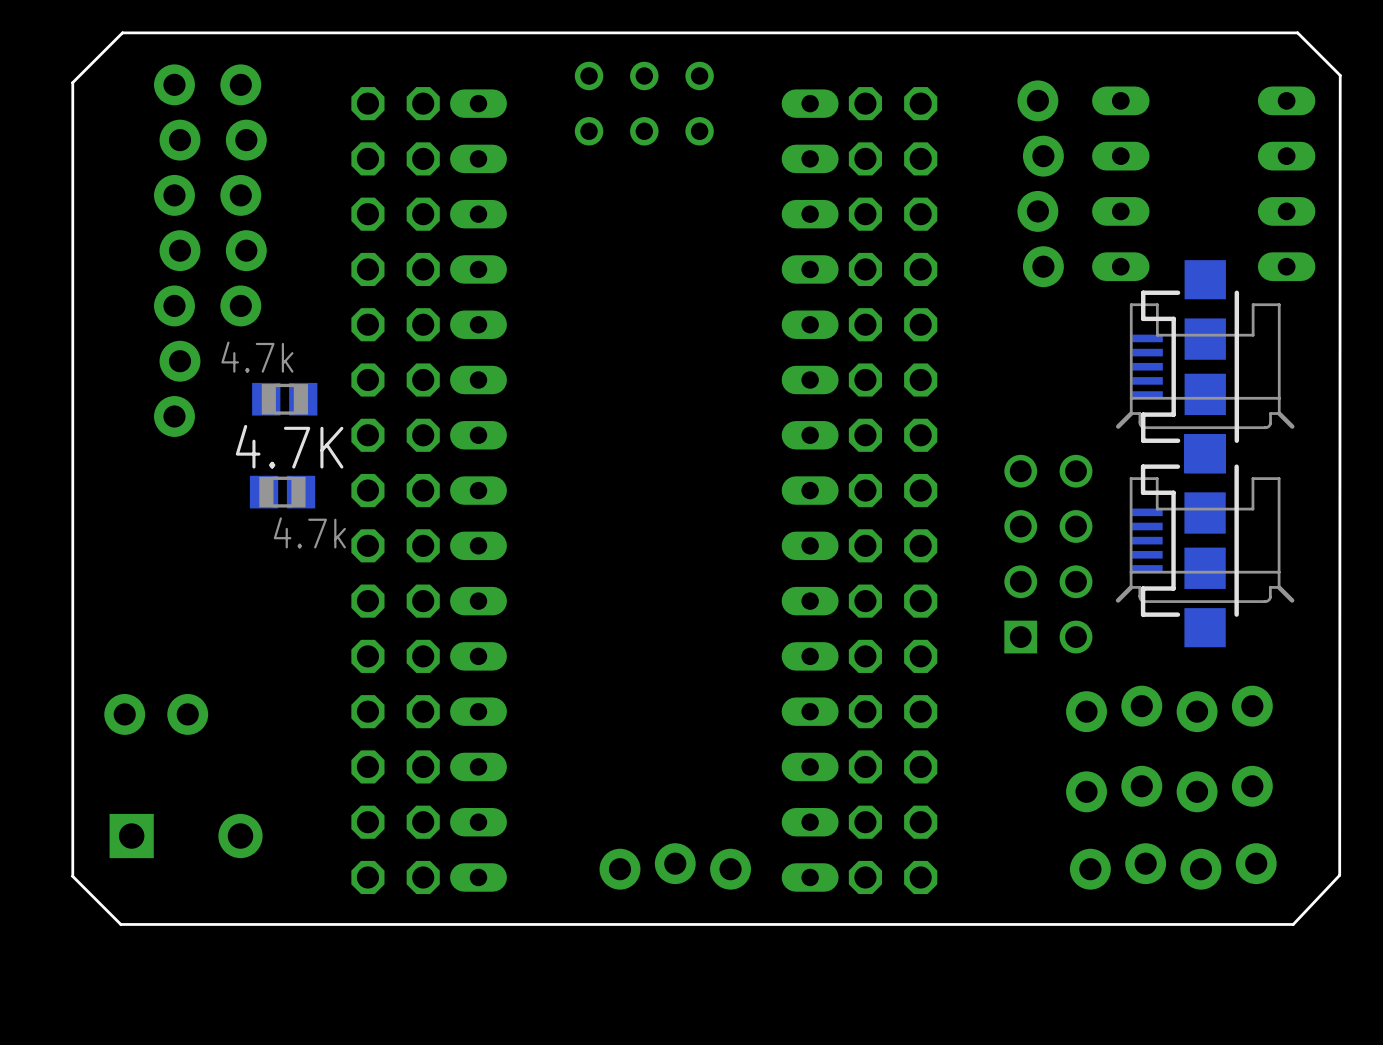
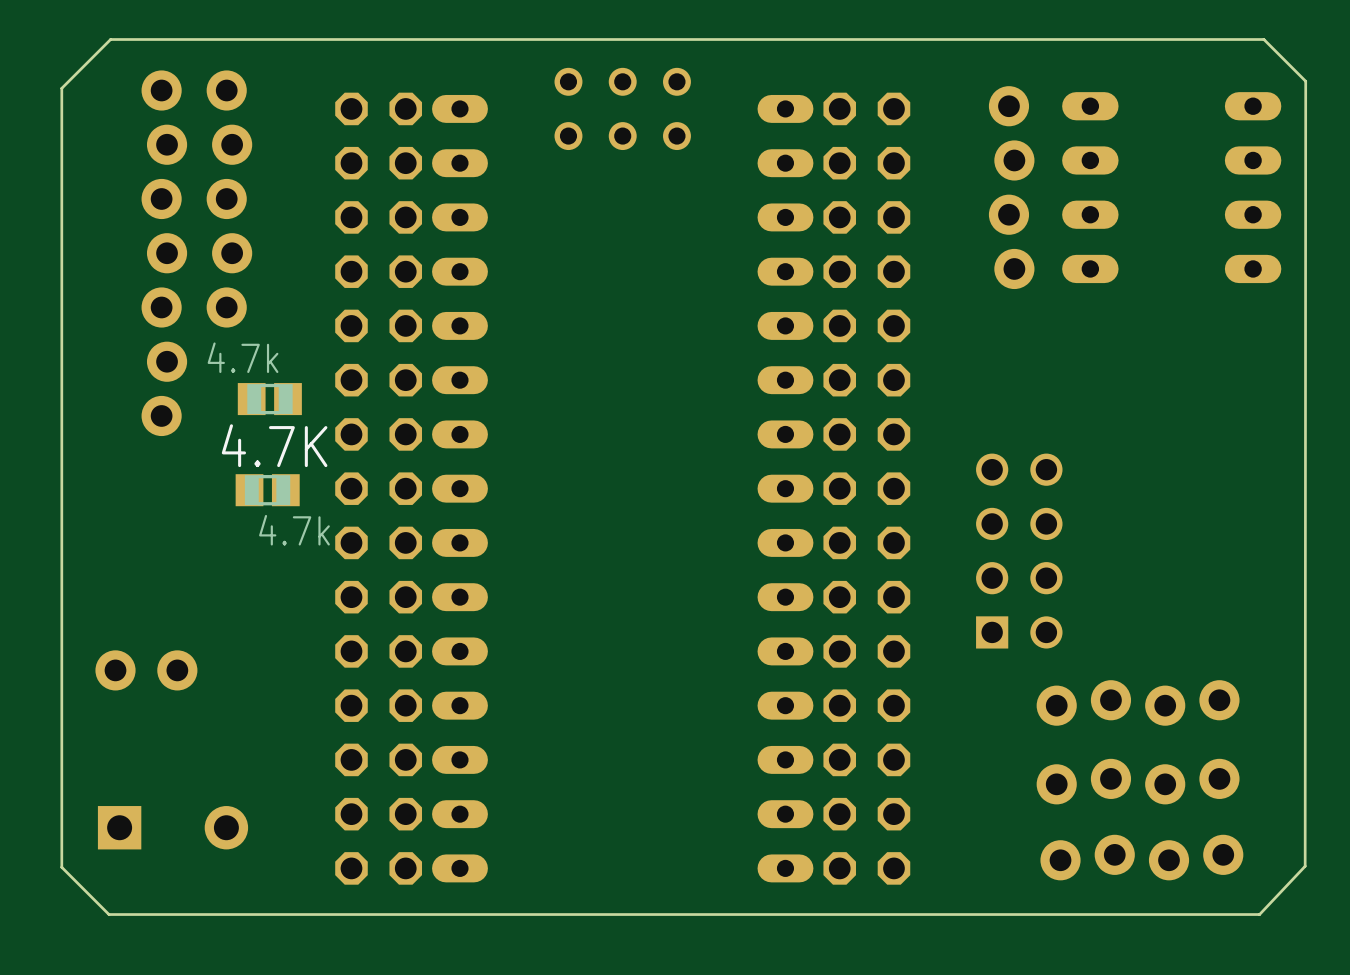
part: (1205, 366) -> none
part: (1205, 540) -> none
part position: (156, 714) -> (146, 670)
part: (675, 866) -> none

